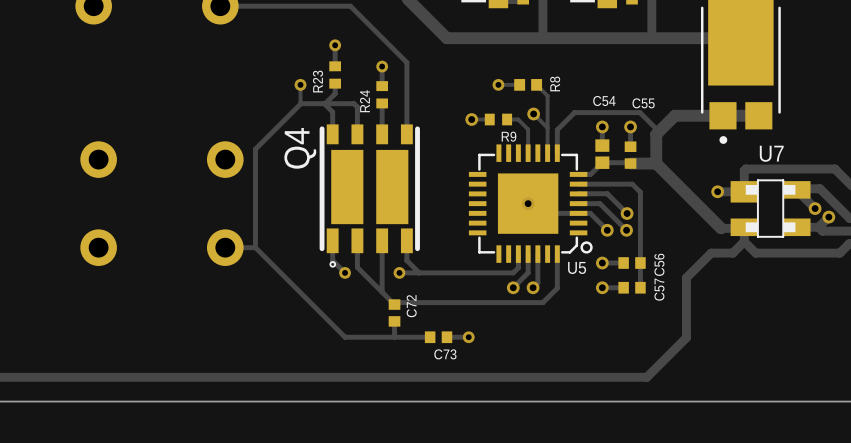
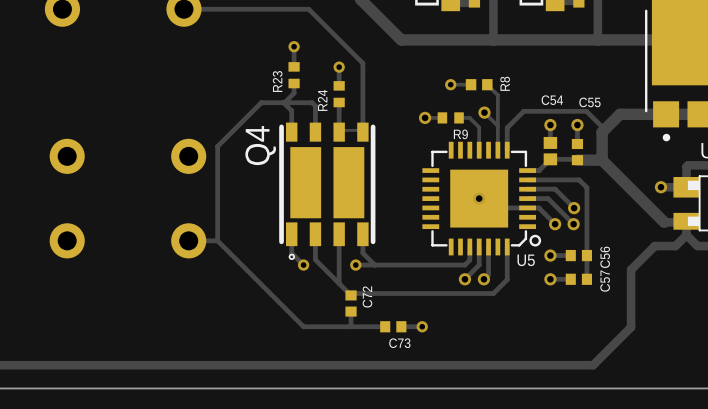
track: (300, 84) (301, 103) -> none
via: (300, 84) -> none
track: none -> (362, 132) (361, 130) (340, 130) (339, 132)

